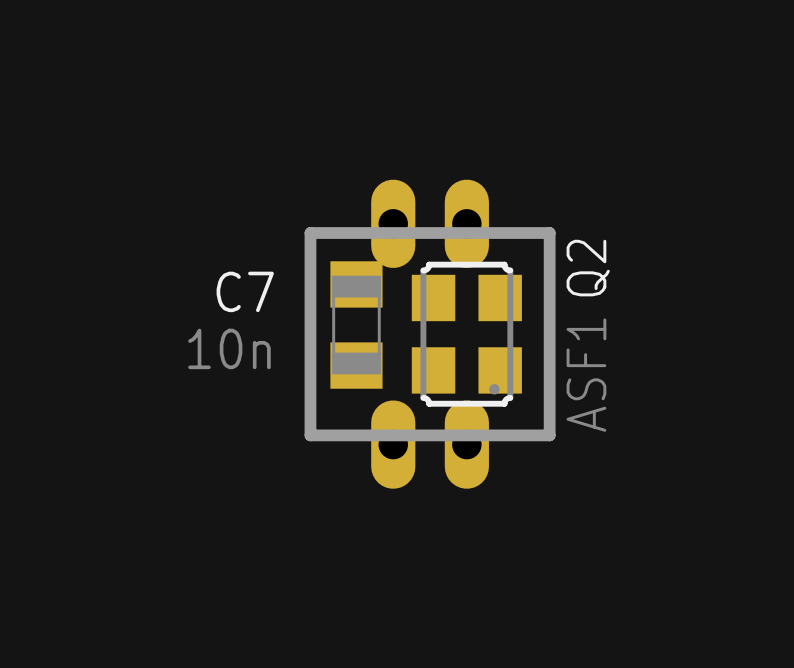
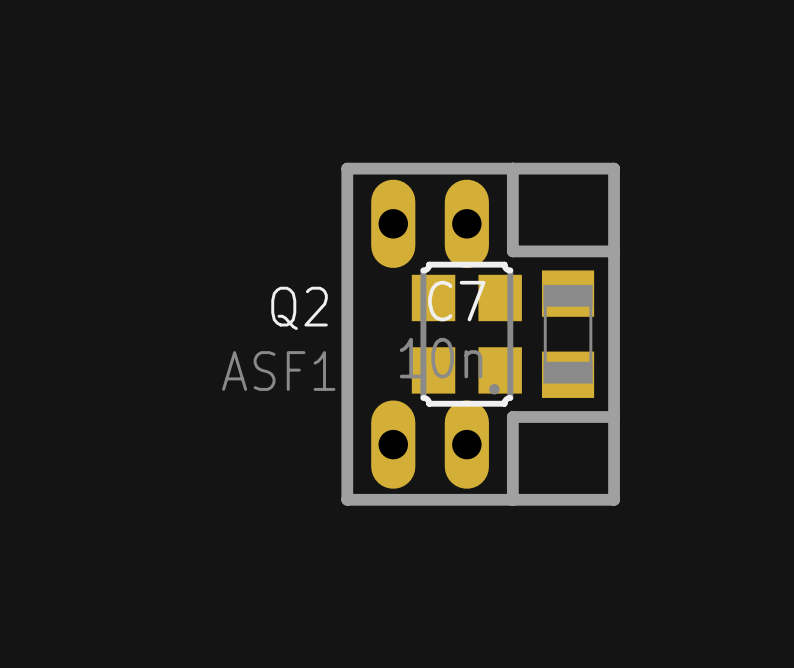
board edge: none -> (512, 168) (512, 251) (614, 251)
board edge: none -> (614, 168) (347, 168) (347, 499) (614, 499) (614, 168)
board edge: (549, 233) (310, 233) (310, 435) (549, 435) (549, 233) -> none
Q2 name rotation: 0° (588, 268) -> 90° clockwise (299, 308)
Q2 name position: Q2 (588, 268) -> Q2 (299, 308)
C7 position: (356, 325) -> (568, 334)
Q2 value rotation: 0° (586, 375) -> 90° clockwise (278, 371)
Q2 value position: ASF1 (586, 375) -> ASF1 (278, 371)
board edge: none -> (614, 417) (512, 417) (512, 499)

